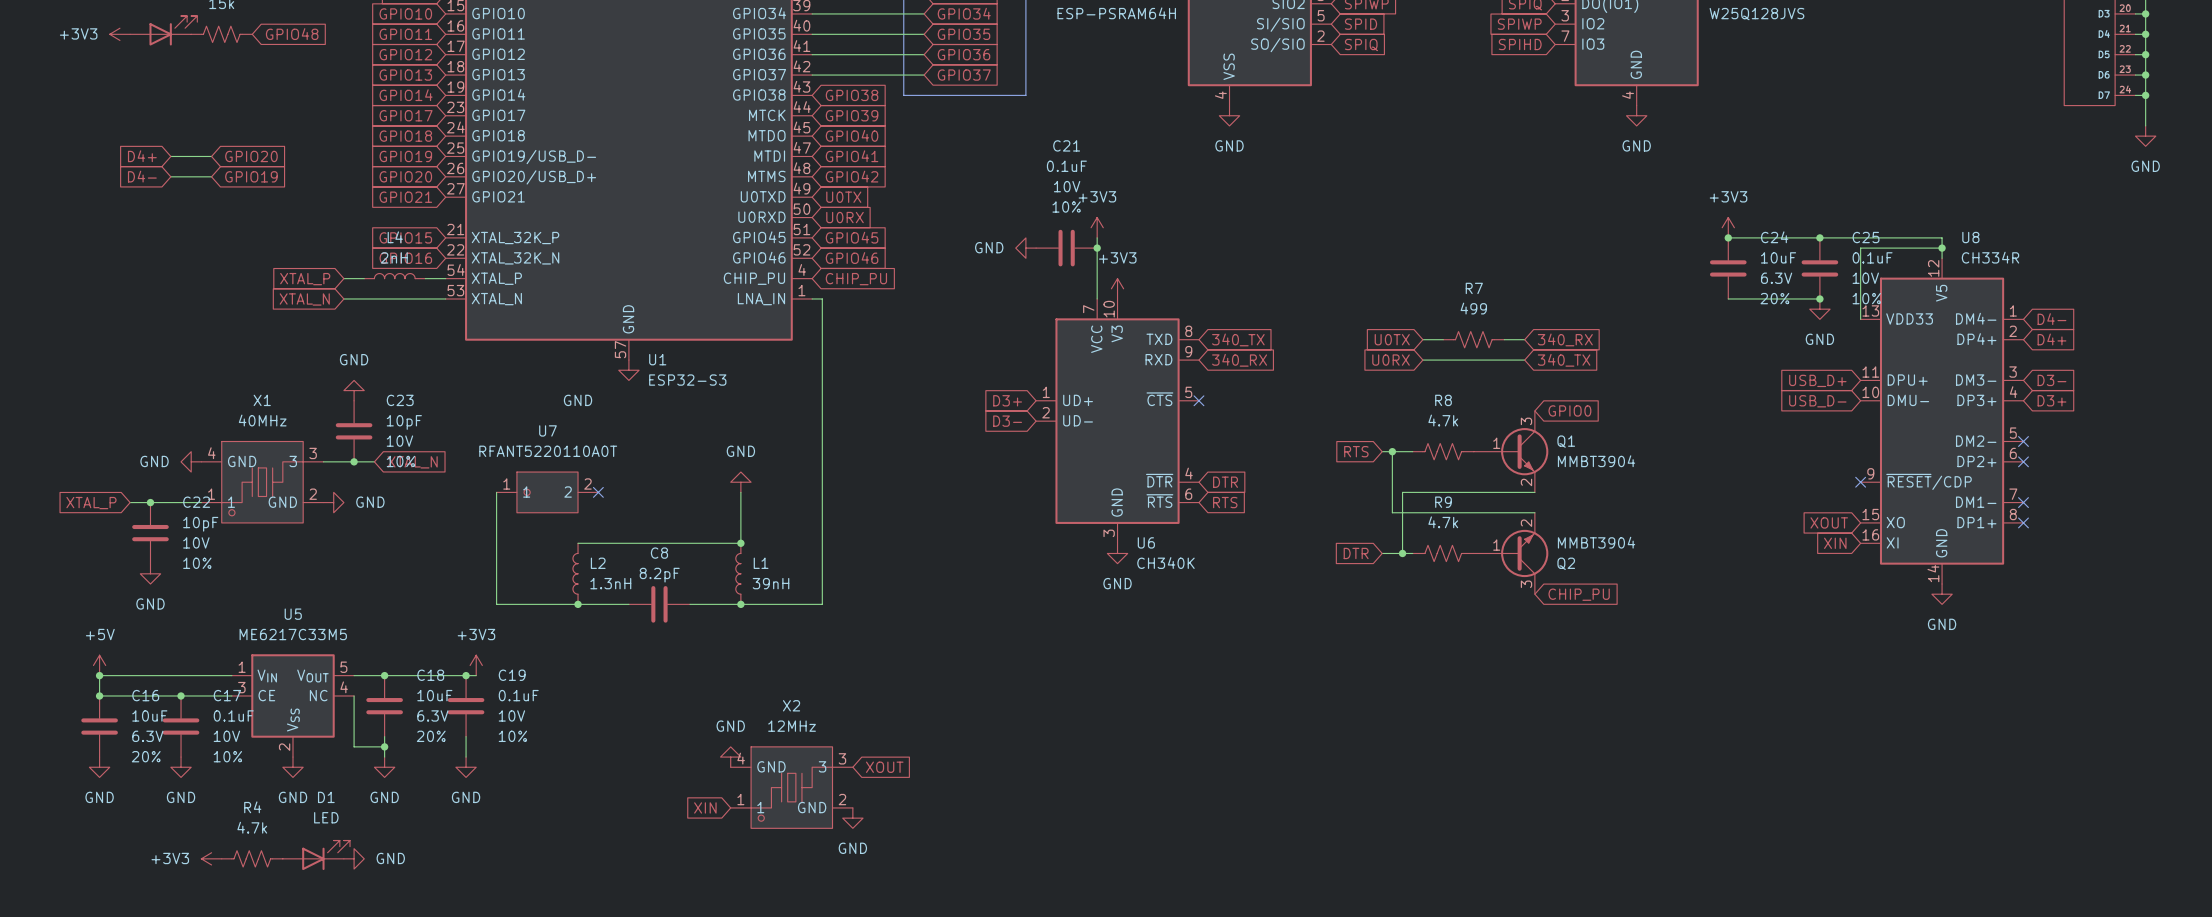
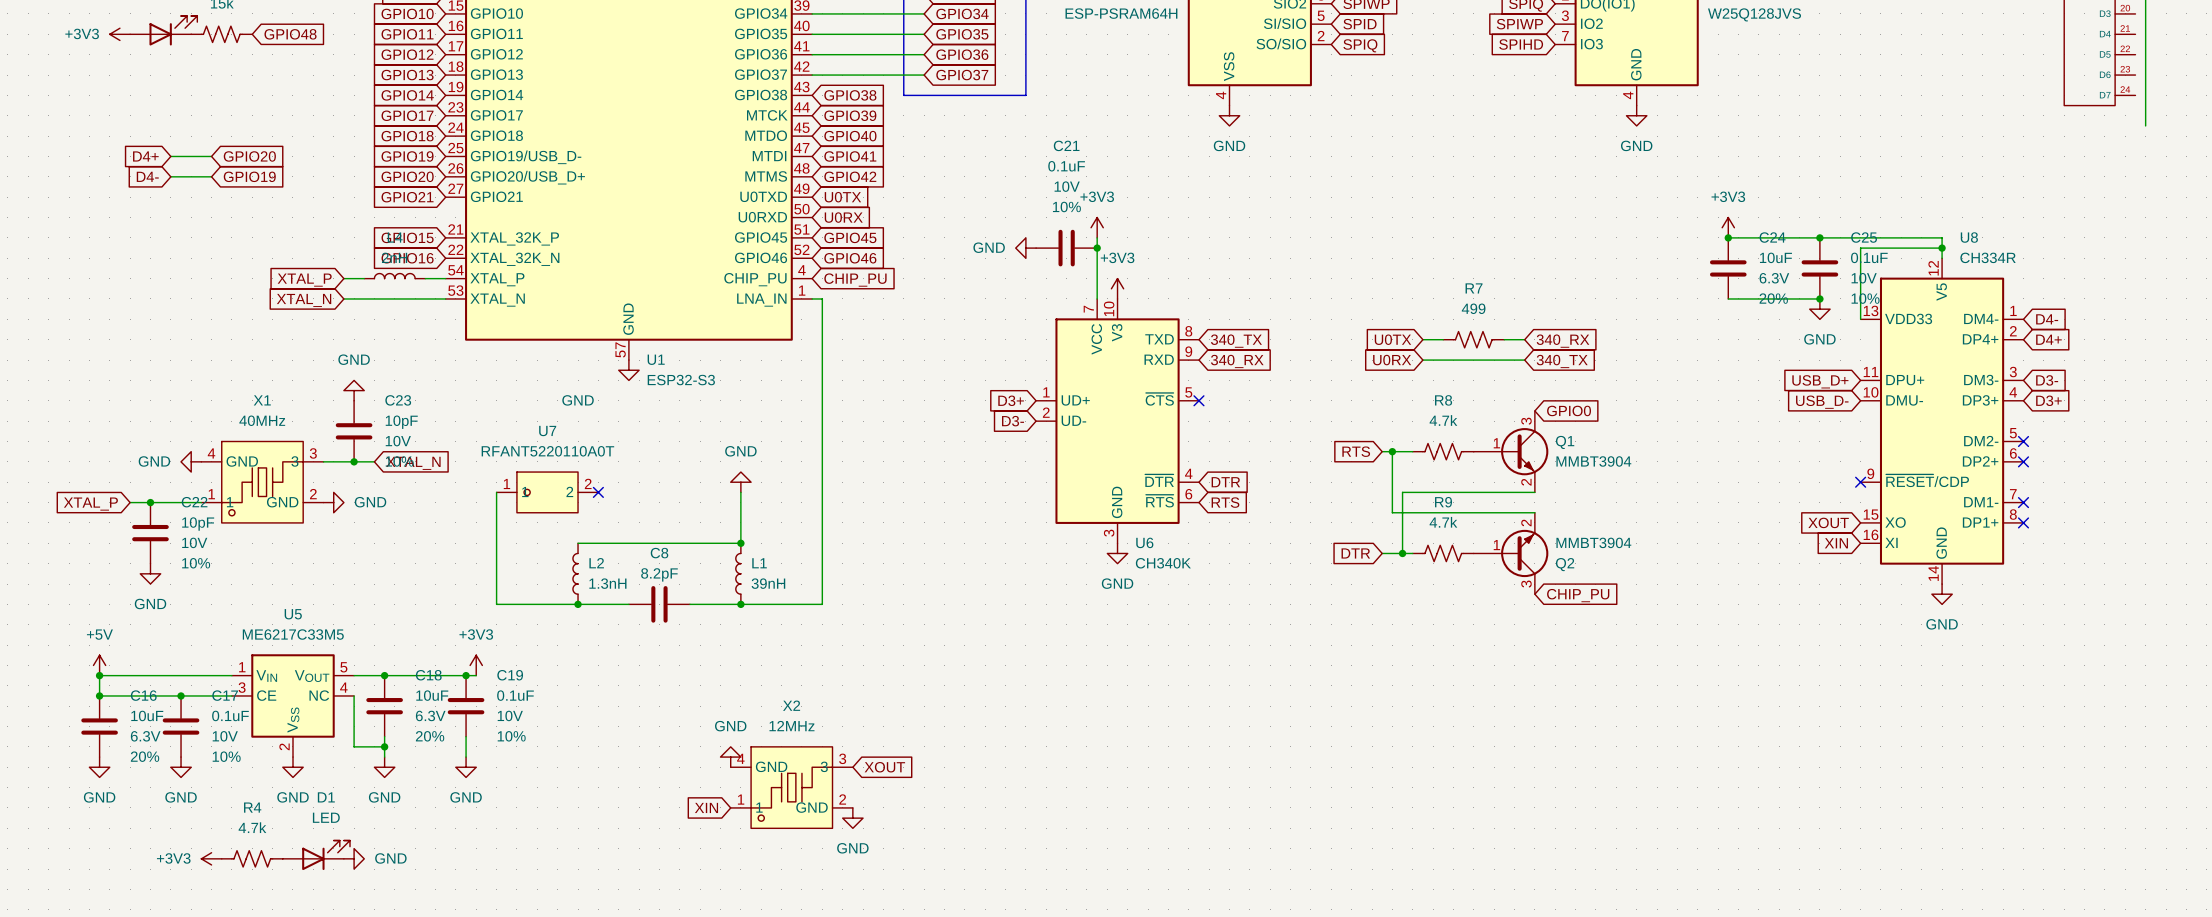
wire: (2135, 13) (2145, 13) -> none
junction: (2145, 13) -> none
wire: (2135, 34) (2145, 34) -> none
junction: (2145, 34) -> none
wire: (2135, 54) (2145, 54) -> none
junction: (2145, 54) -> none
wire: (2135, 75) (2145, 75) -> none
junction: (2145, 75) -> none
wire: (2135, 95) (2145, 95) -> none
junction: (2145, 95) -> none
power symbol: GND (2145, 136) -> none

